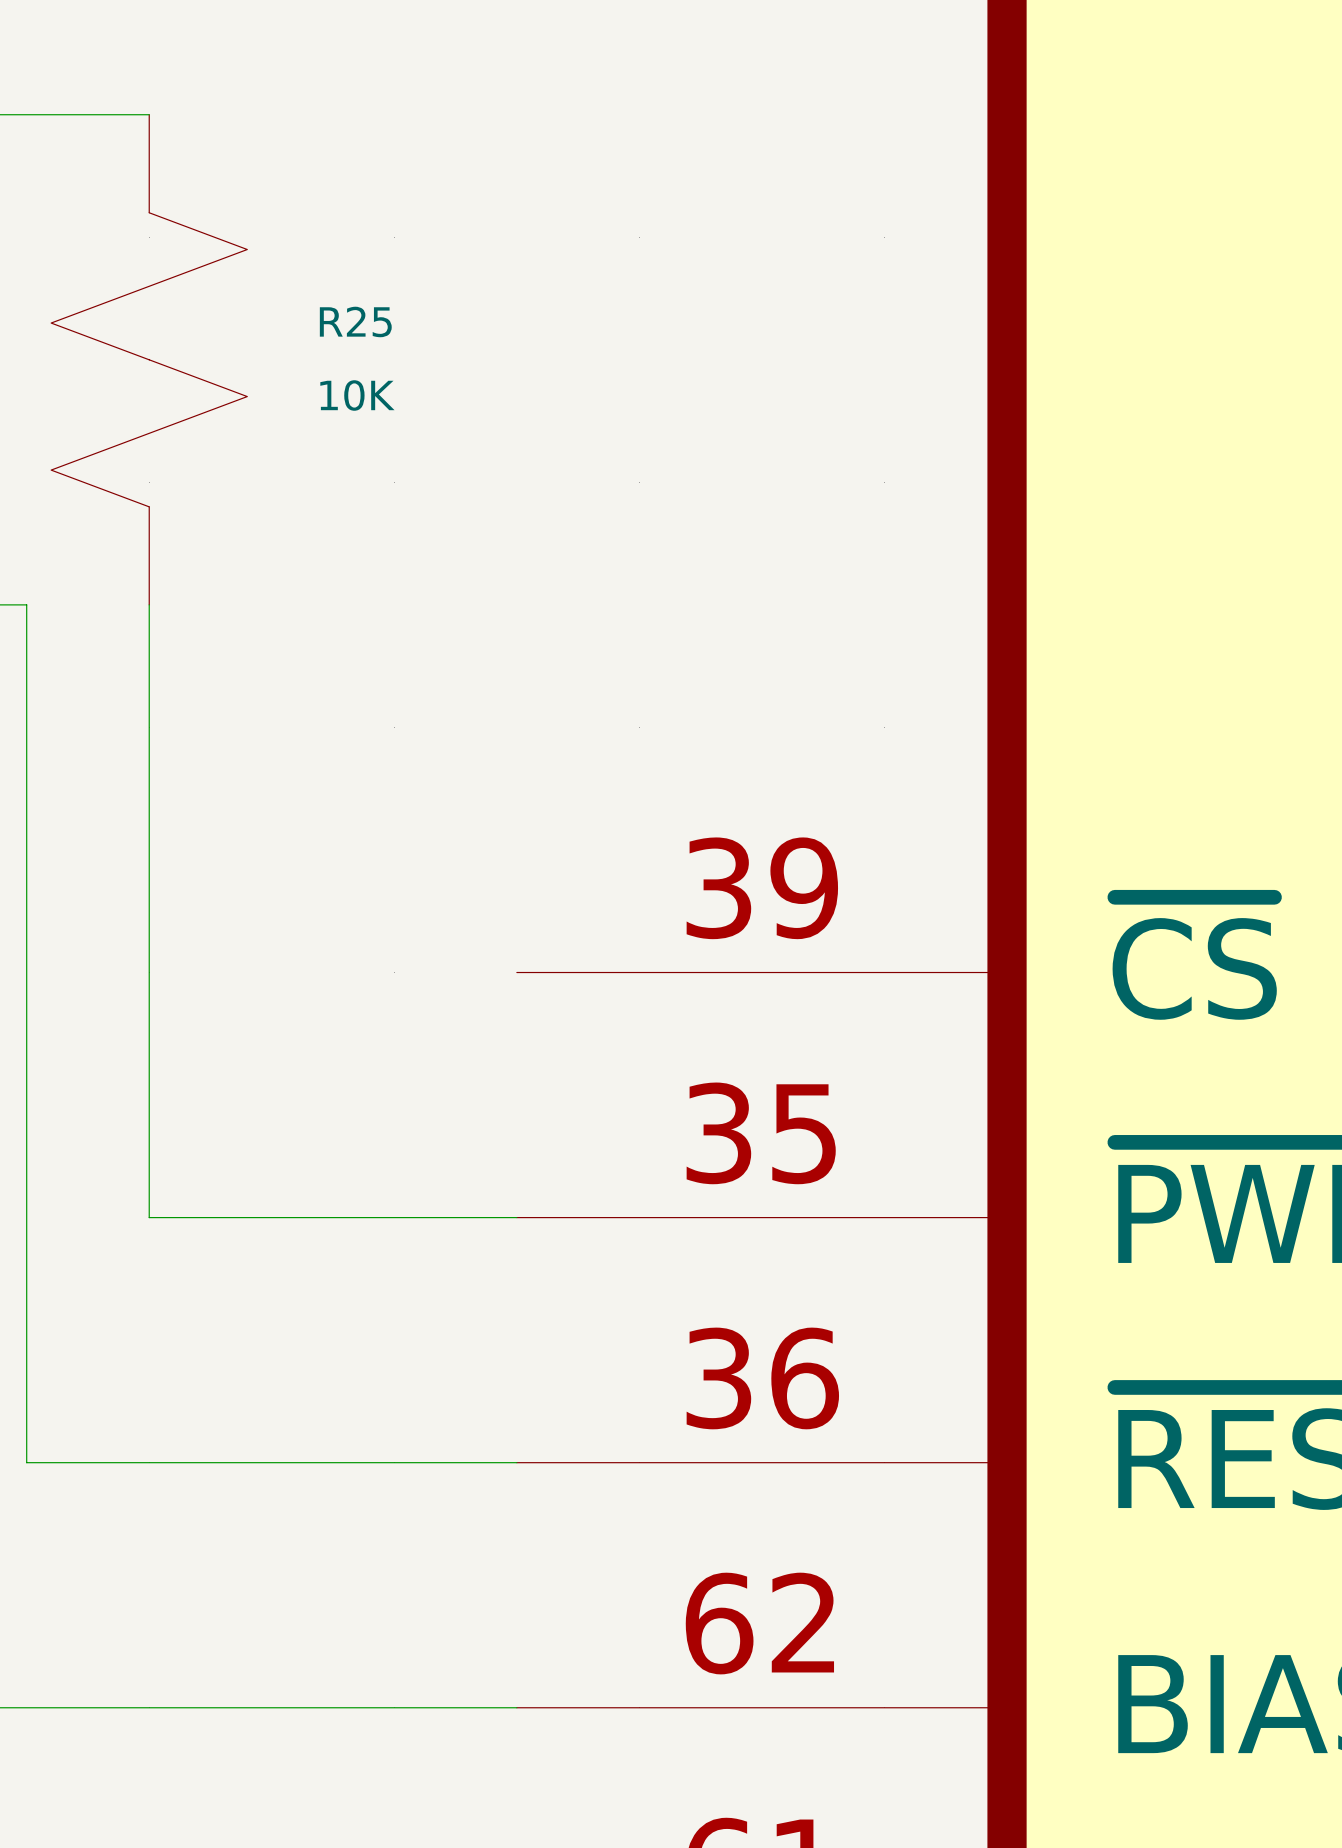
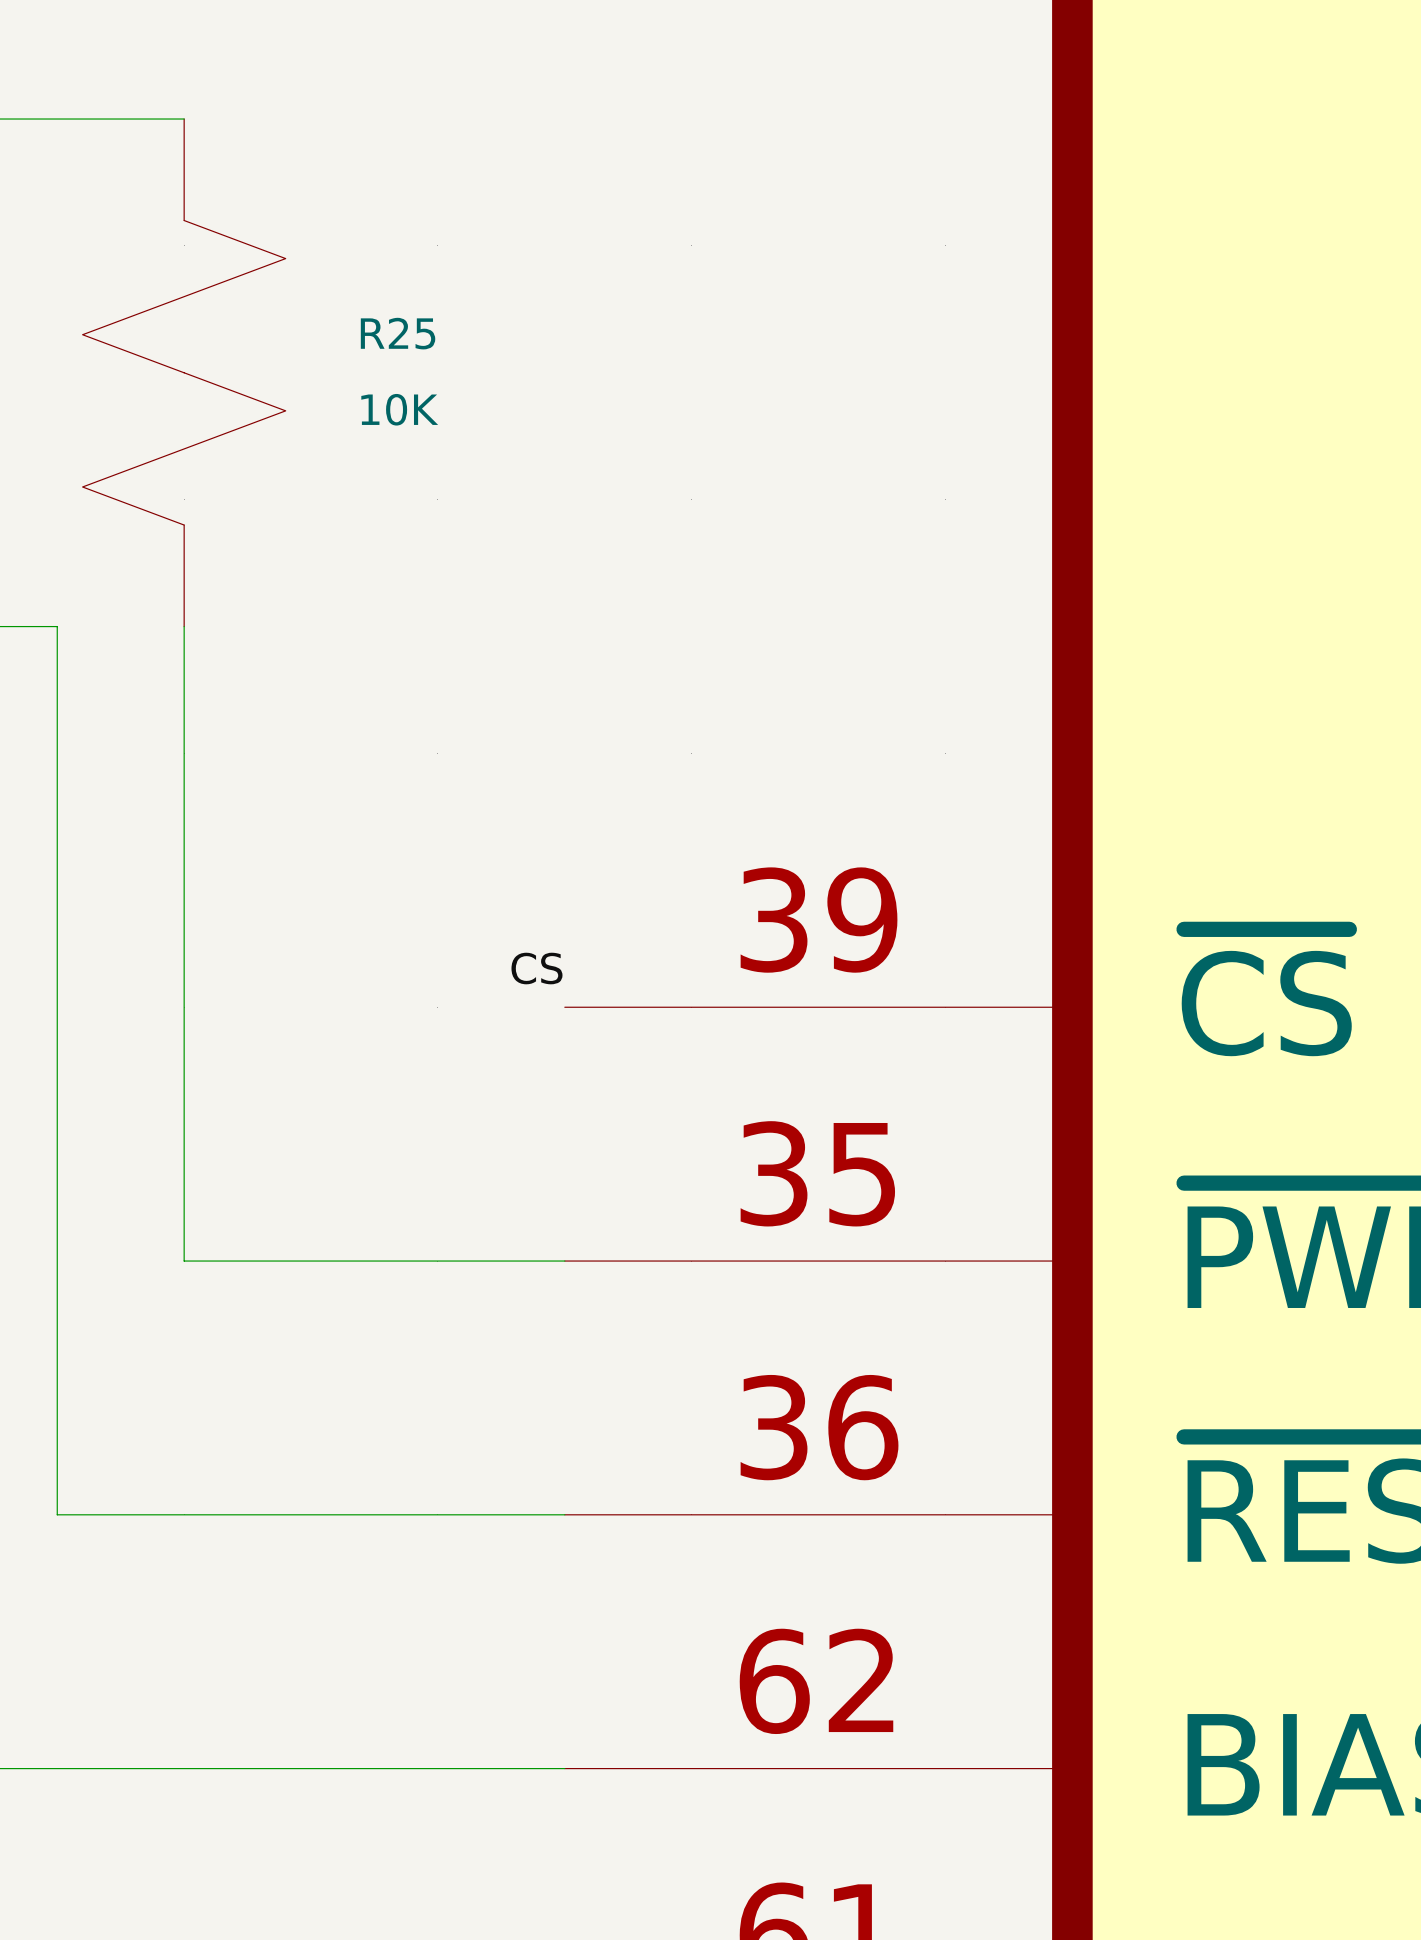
label: none -> CS (536, 968)

